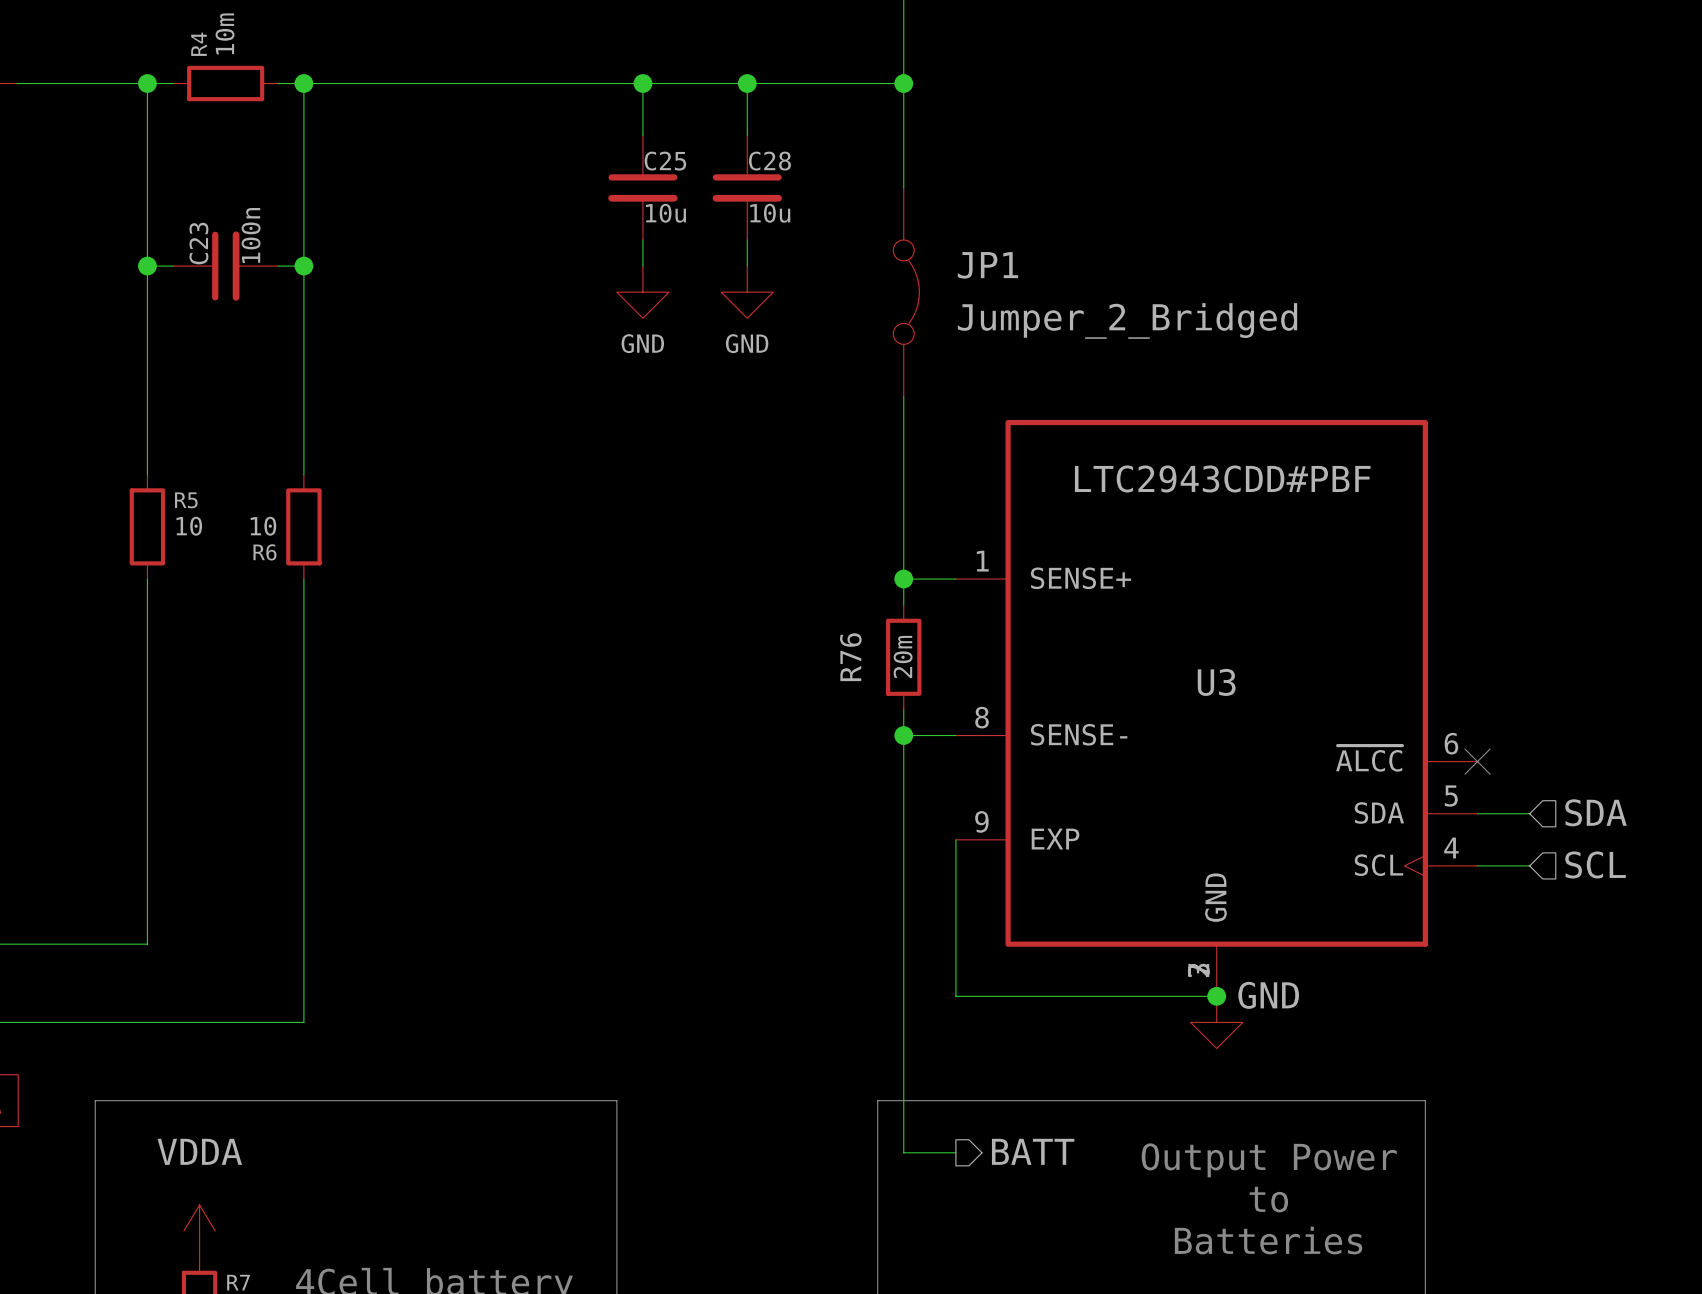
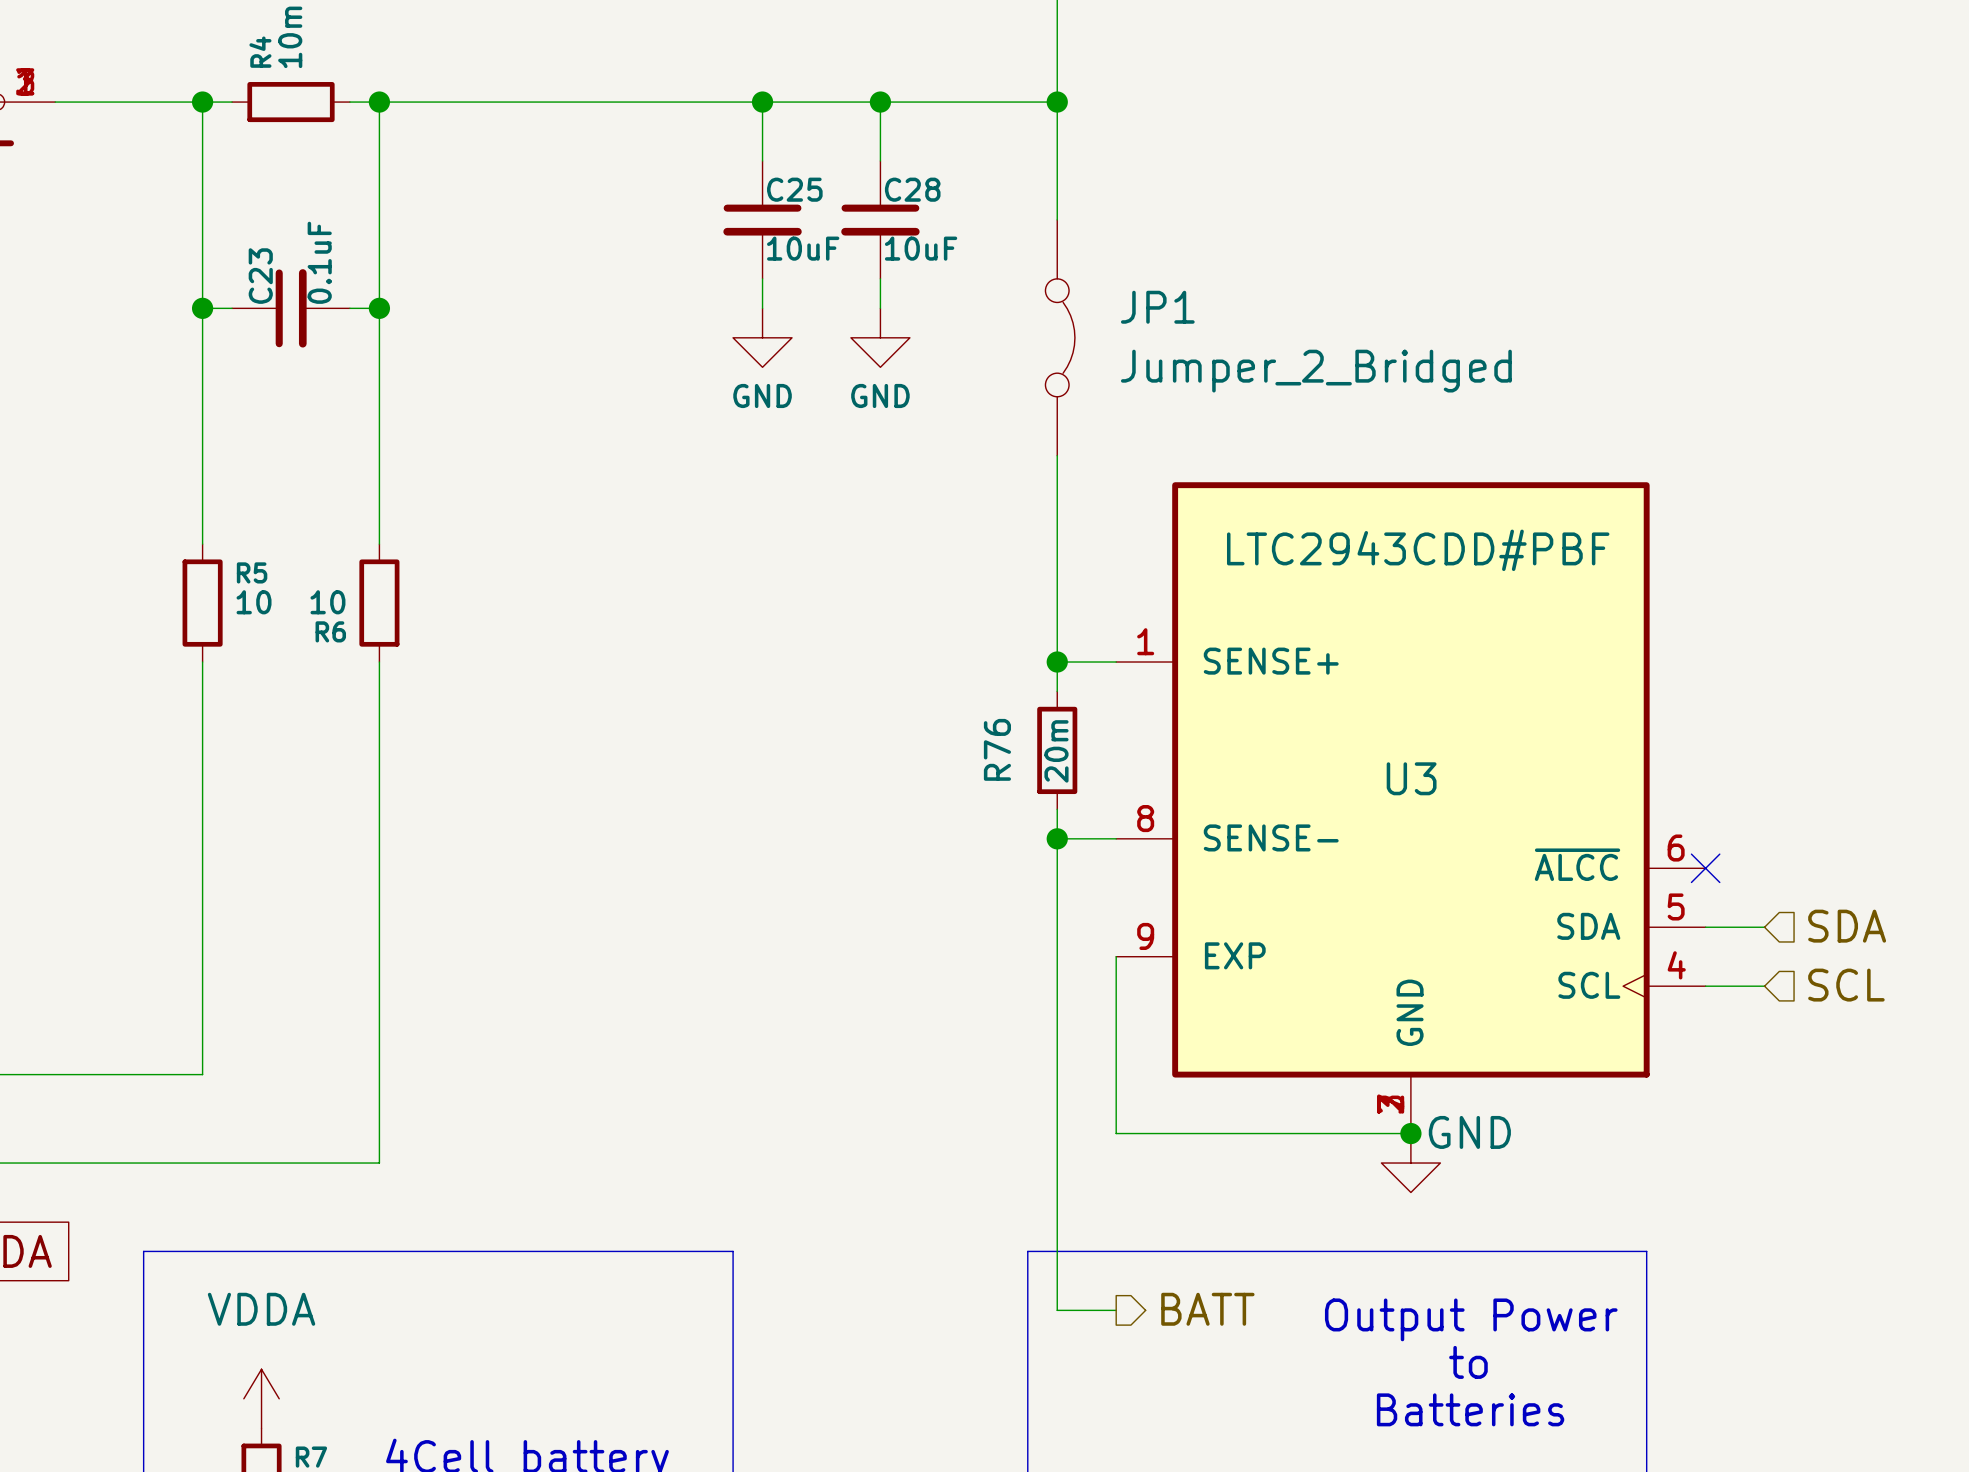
C25 value: 10u (665, 213) -> 10uF (803, 248)
C28 value: 10u (770, 213) -> 10uF (921, 248)
C23 value: 100n (251, 235) -> 0.1uF (319, 262)

